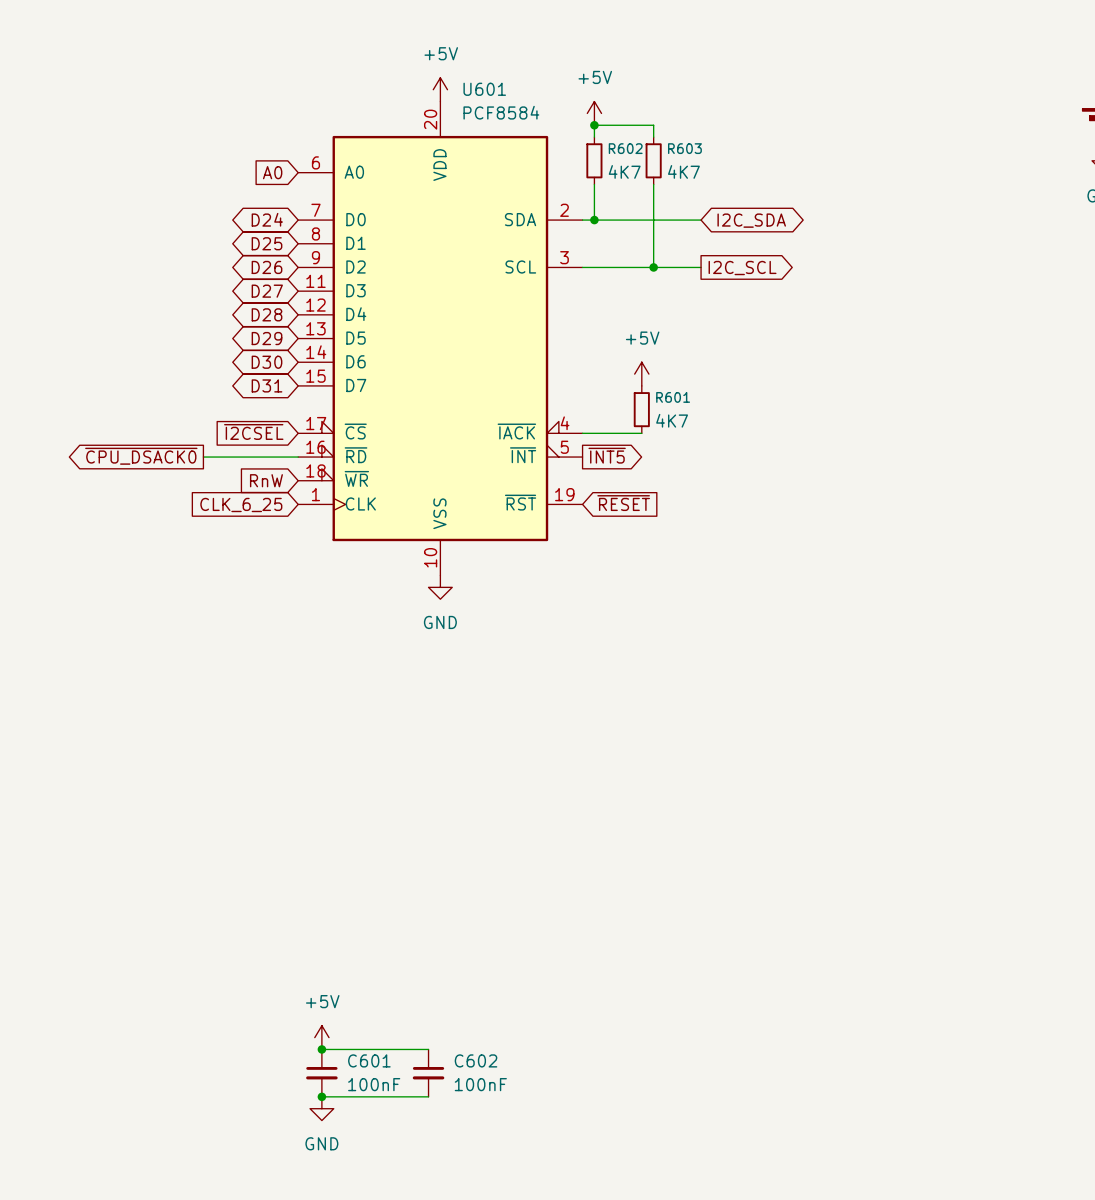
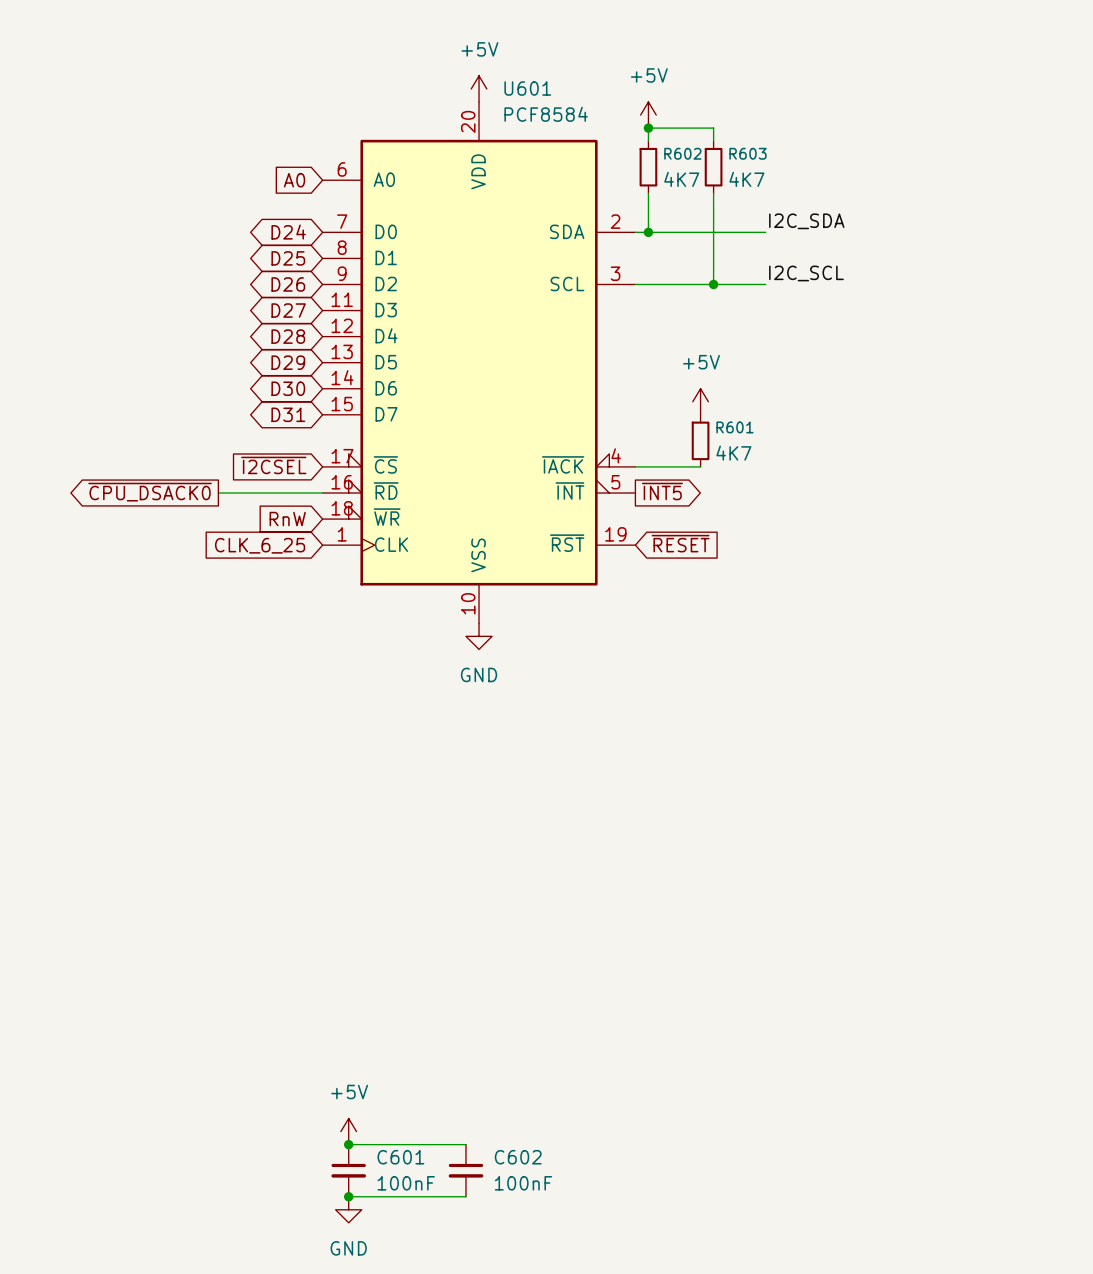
label: none -> I2C_SDA (806, 221)
global label: I2C_SDA (751, 220) -> none
label: none -> I2C_SCL (806, 273)
global label: I2C_SCL (742, 268) -> none

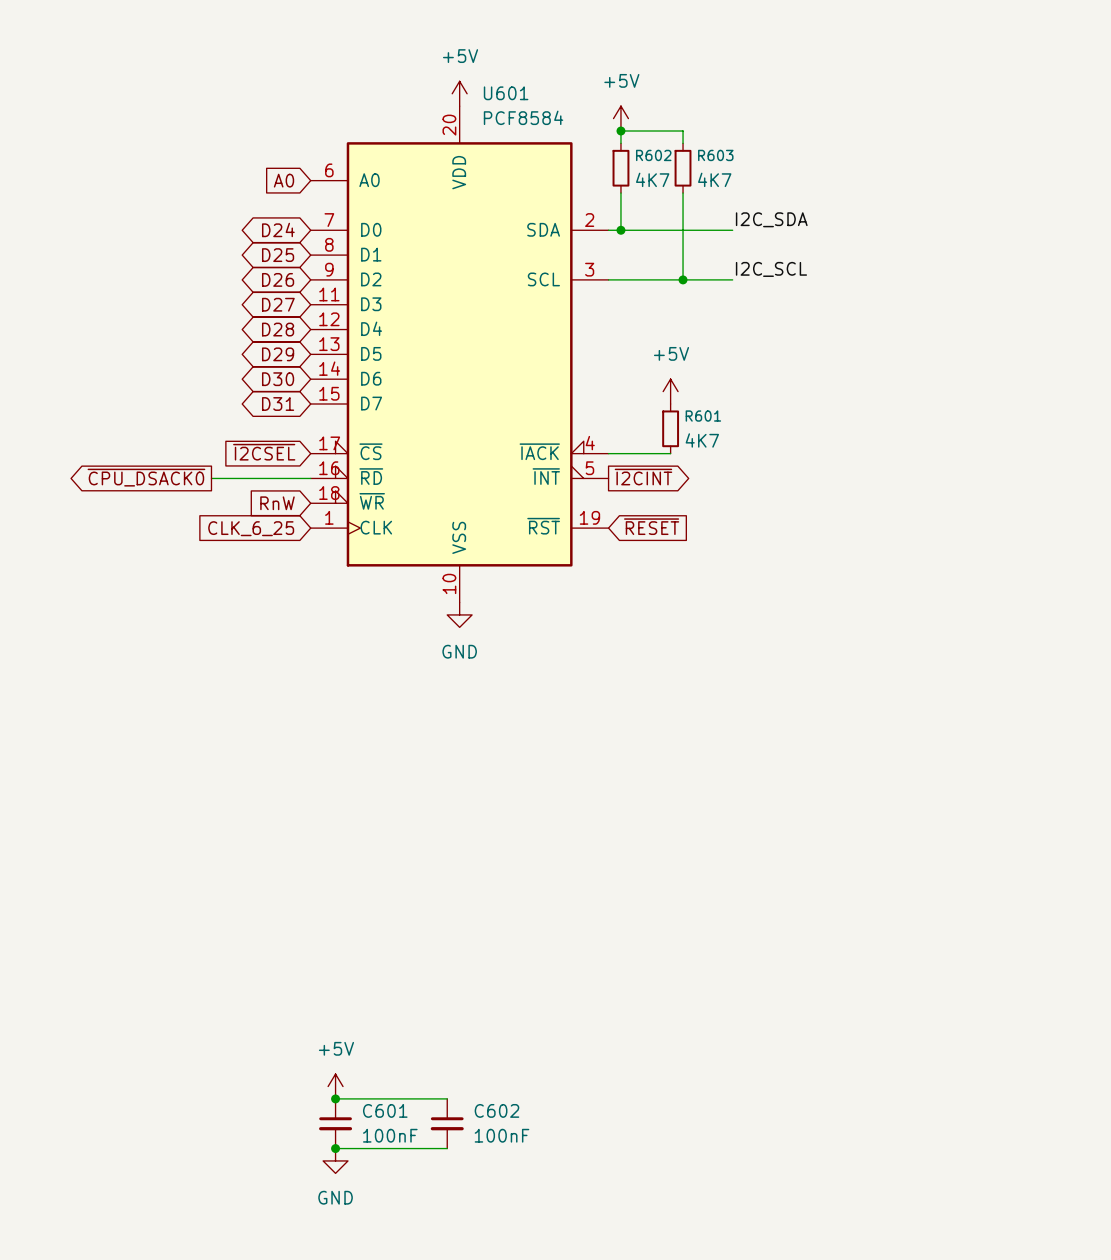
global label: ~{INT5} (662, 491) -> ~{I2CINT} (643, 477)

